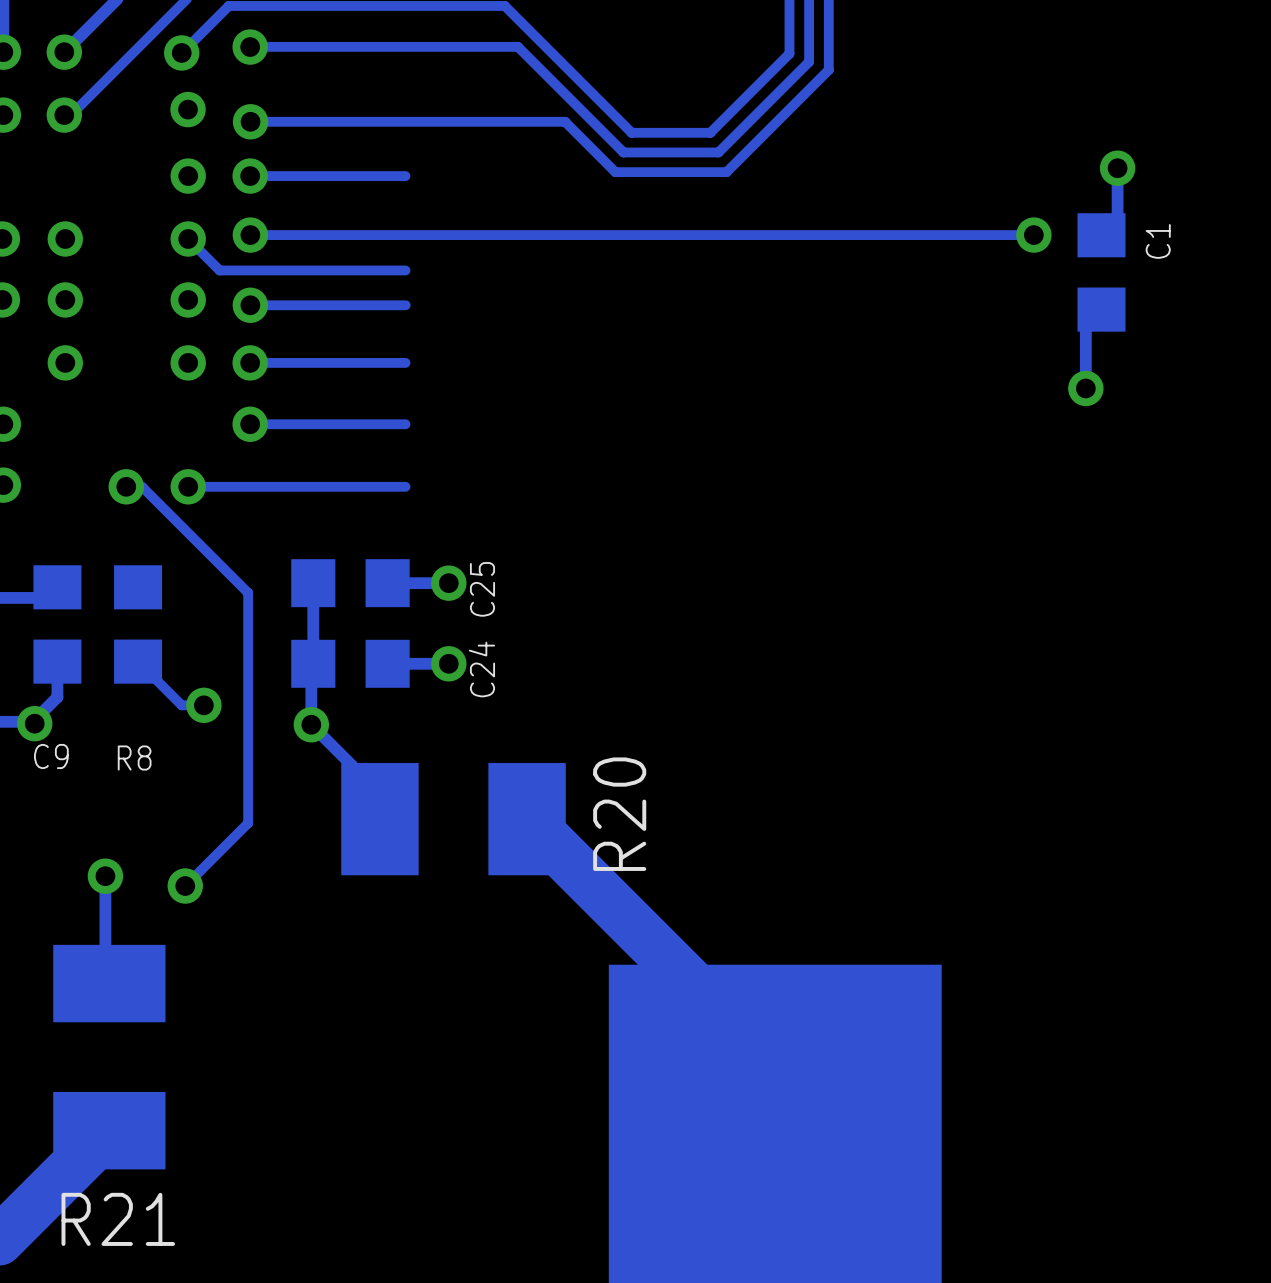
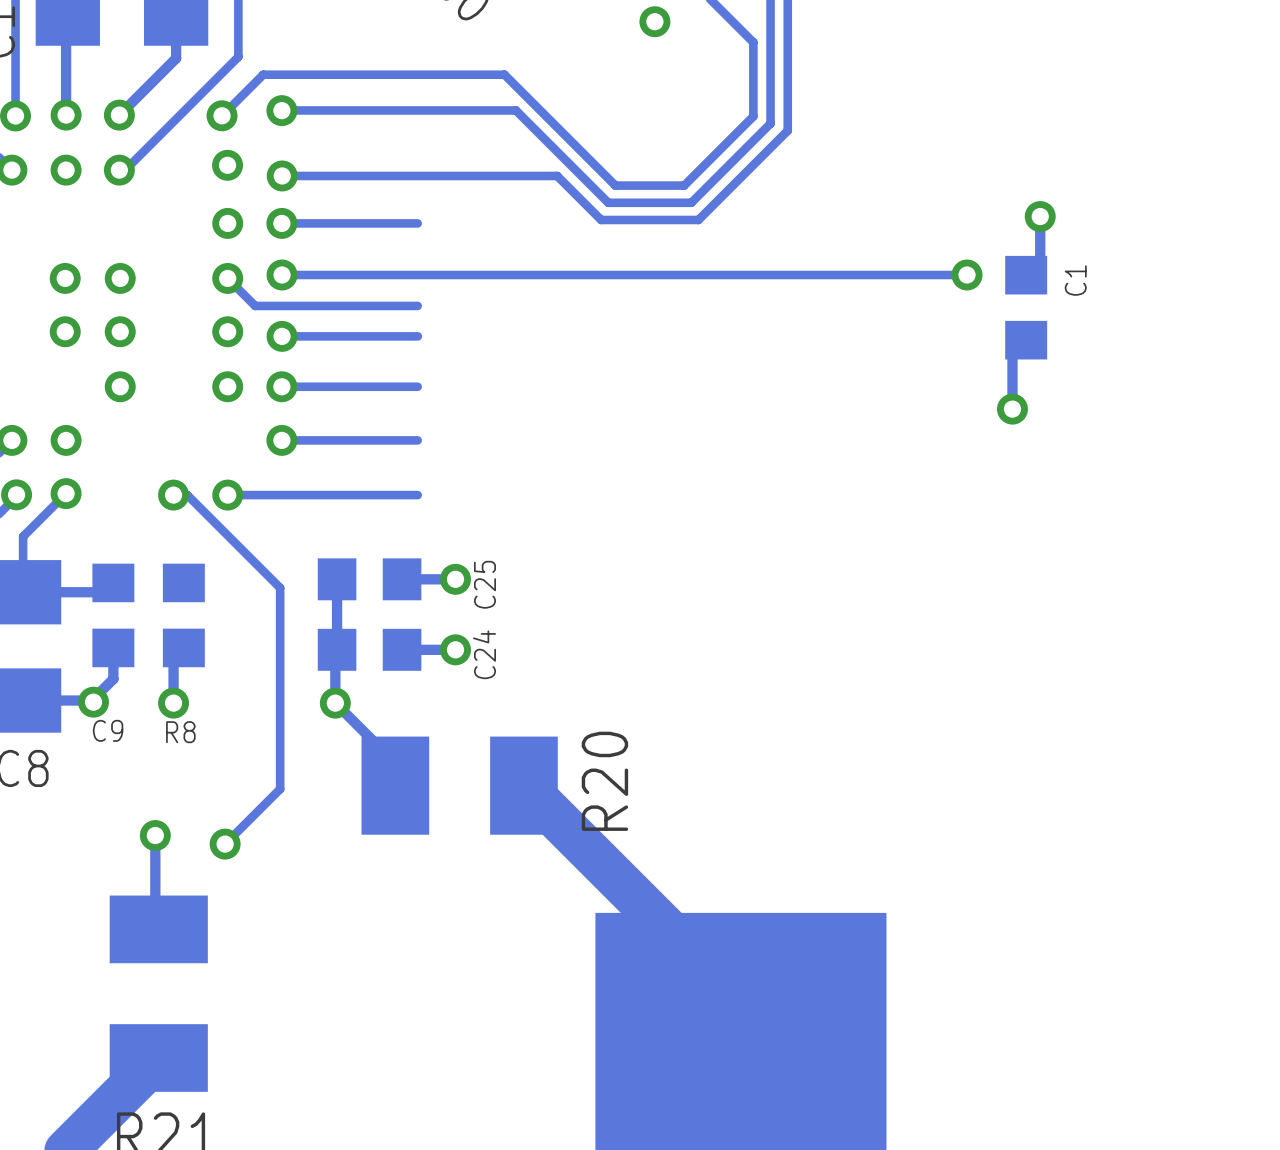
track: (138, 661) (181, 705) (203, 705) -> none
track: none -> (173, 658) (173, 703)
via position: (203, 705) -> (173, 703)

